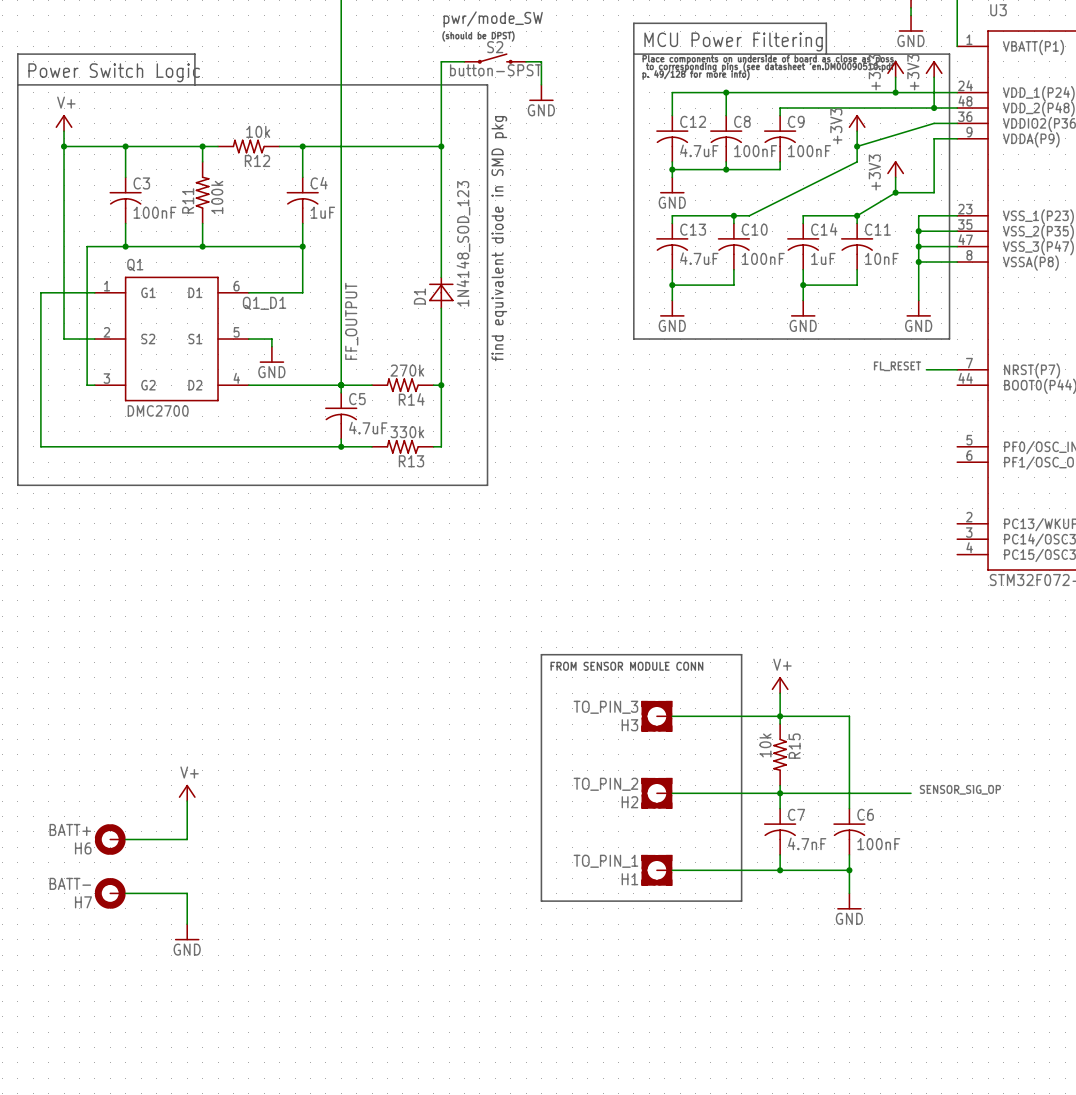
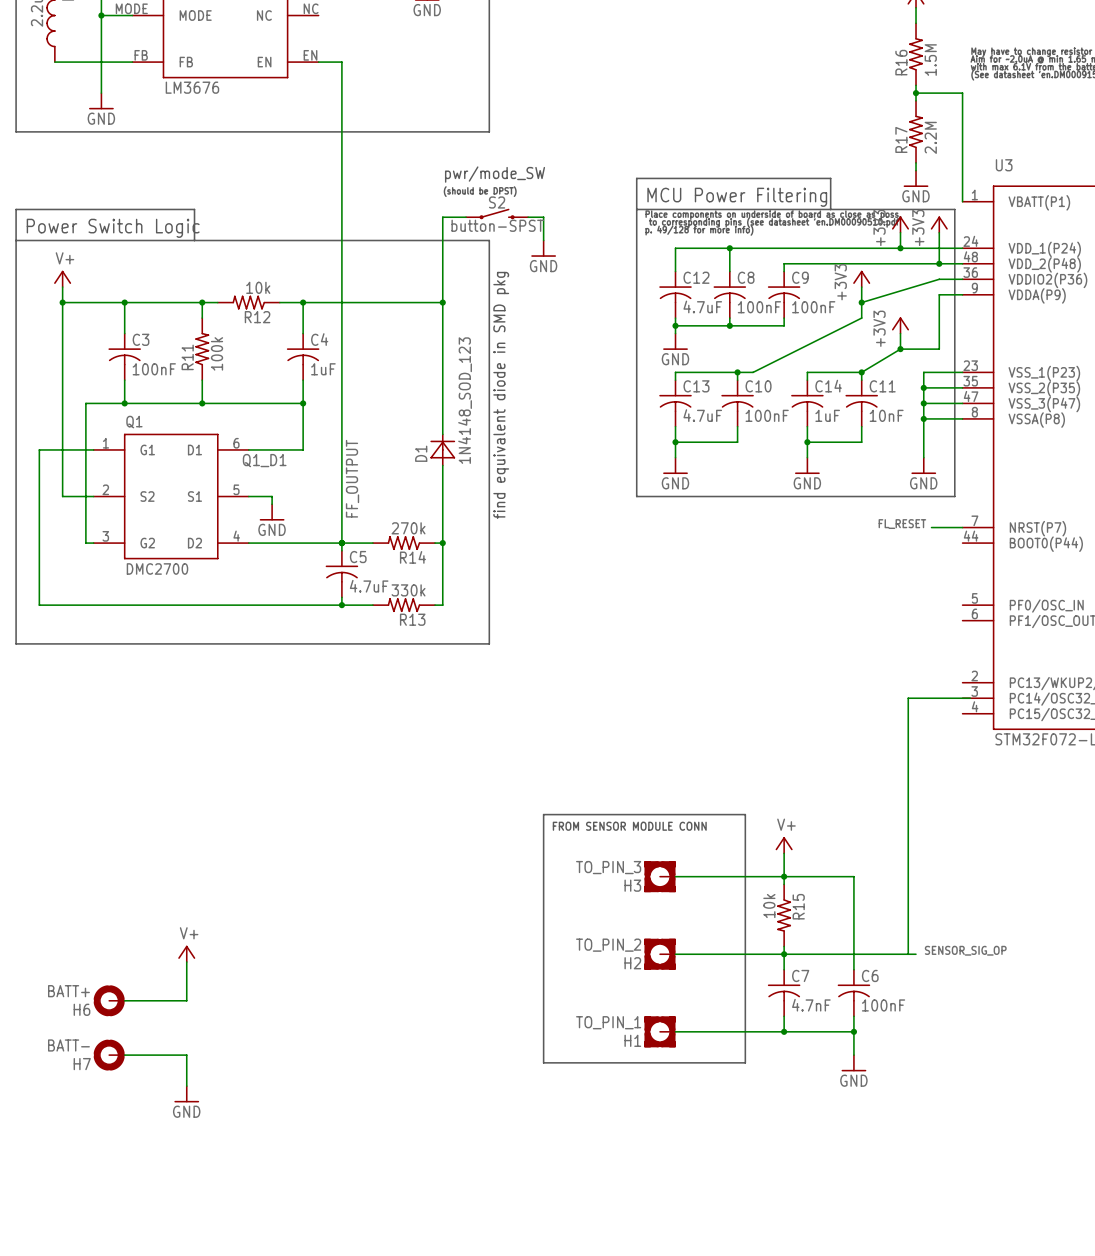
wire: none -> (970, 698) (908, 698) (908, 954)

